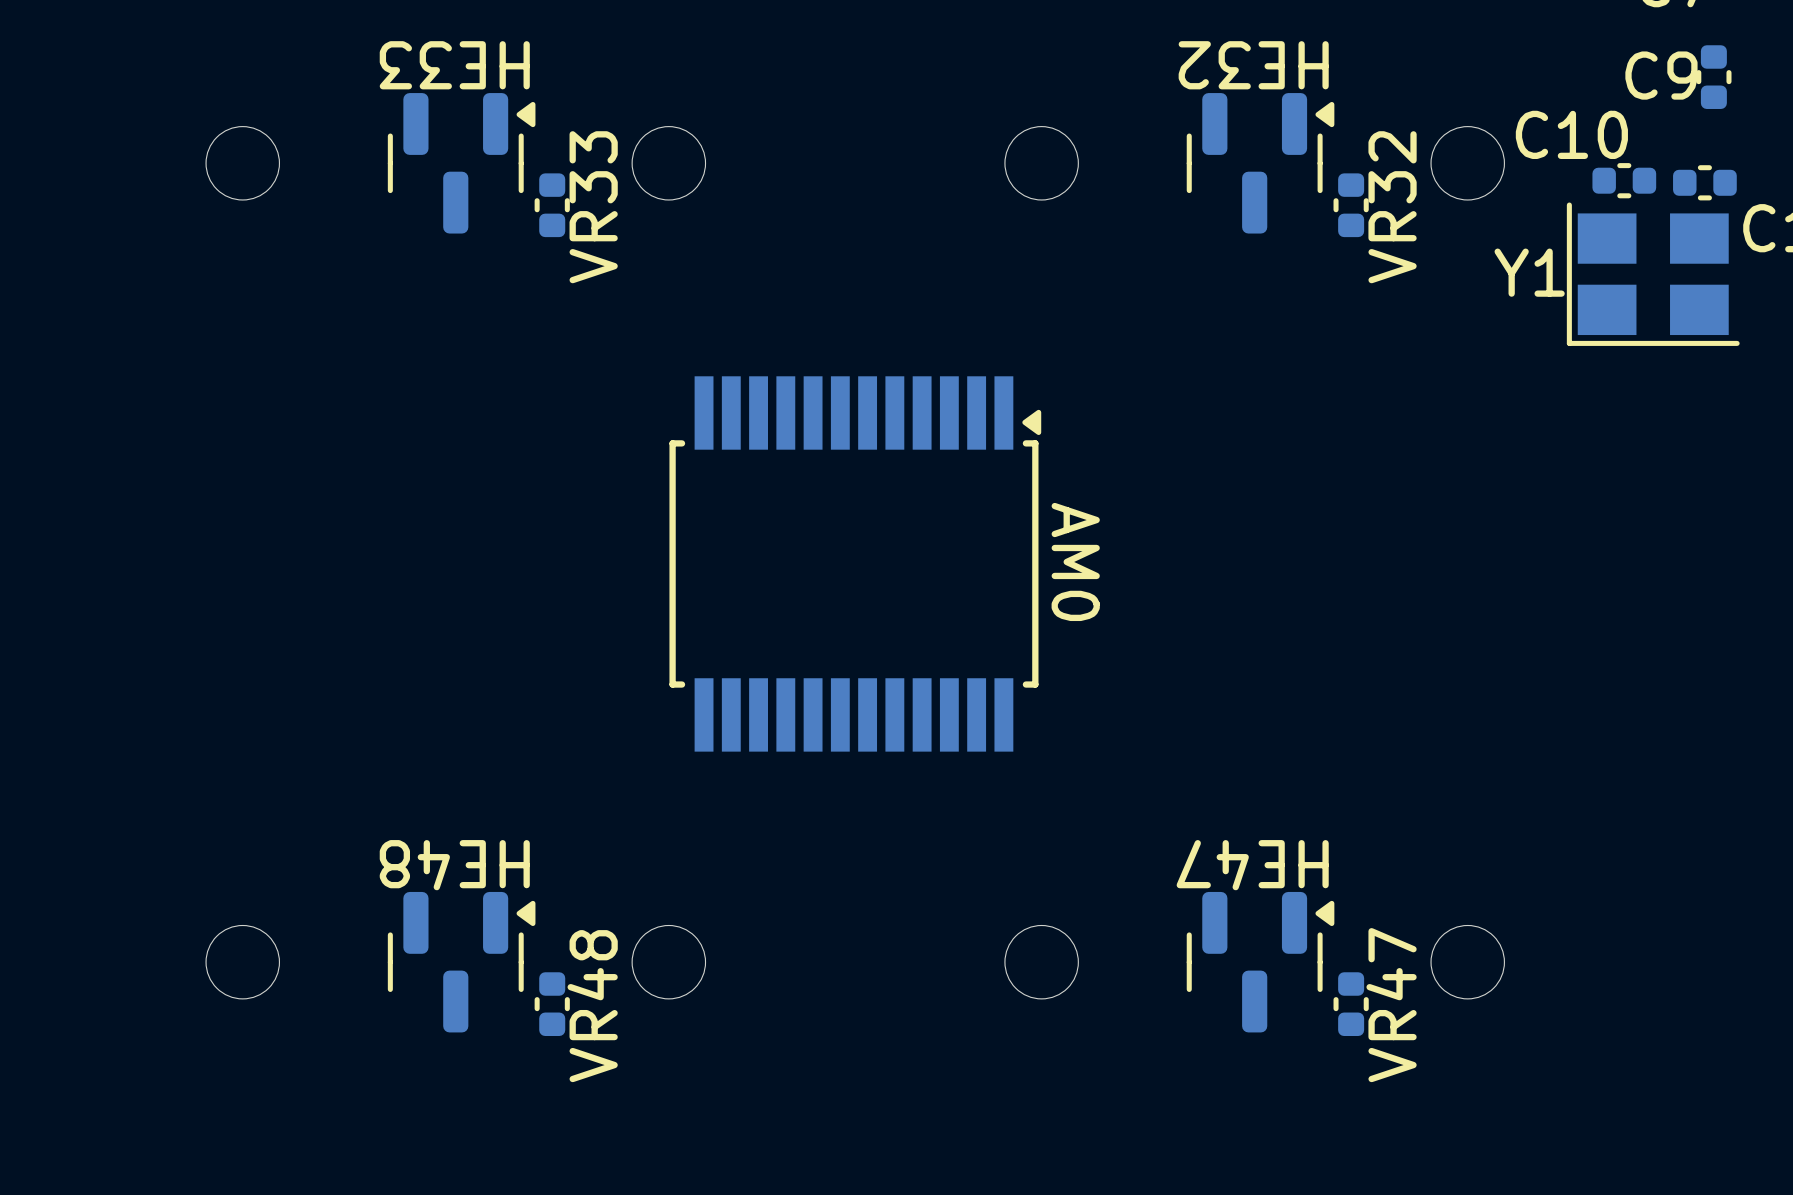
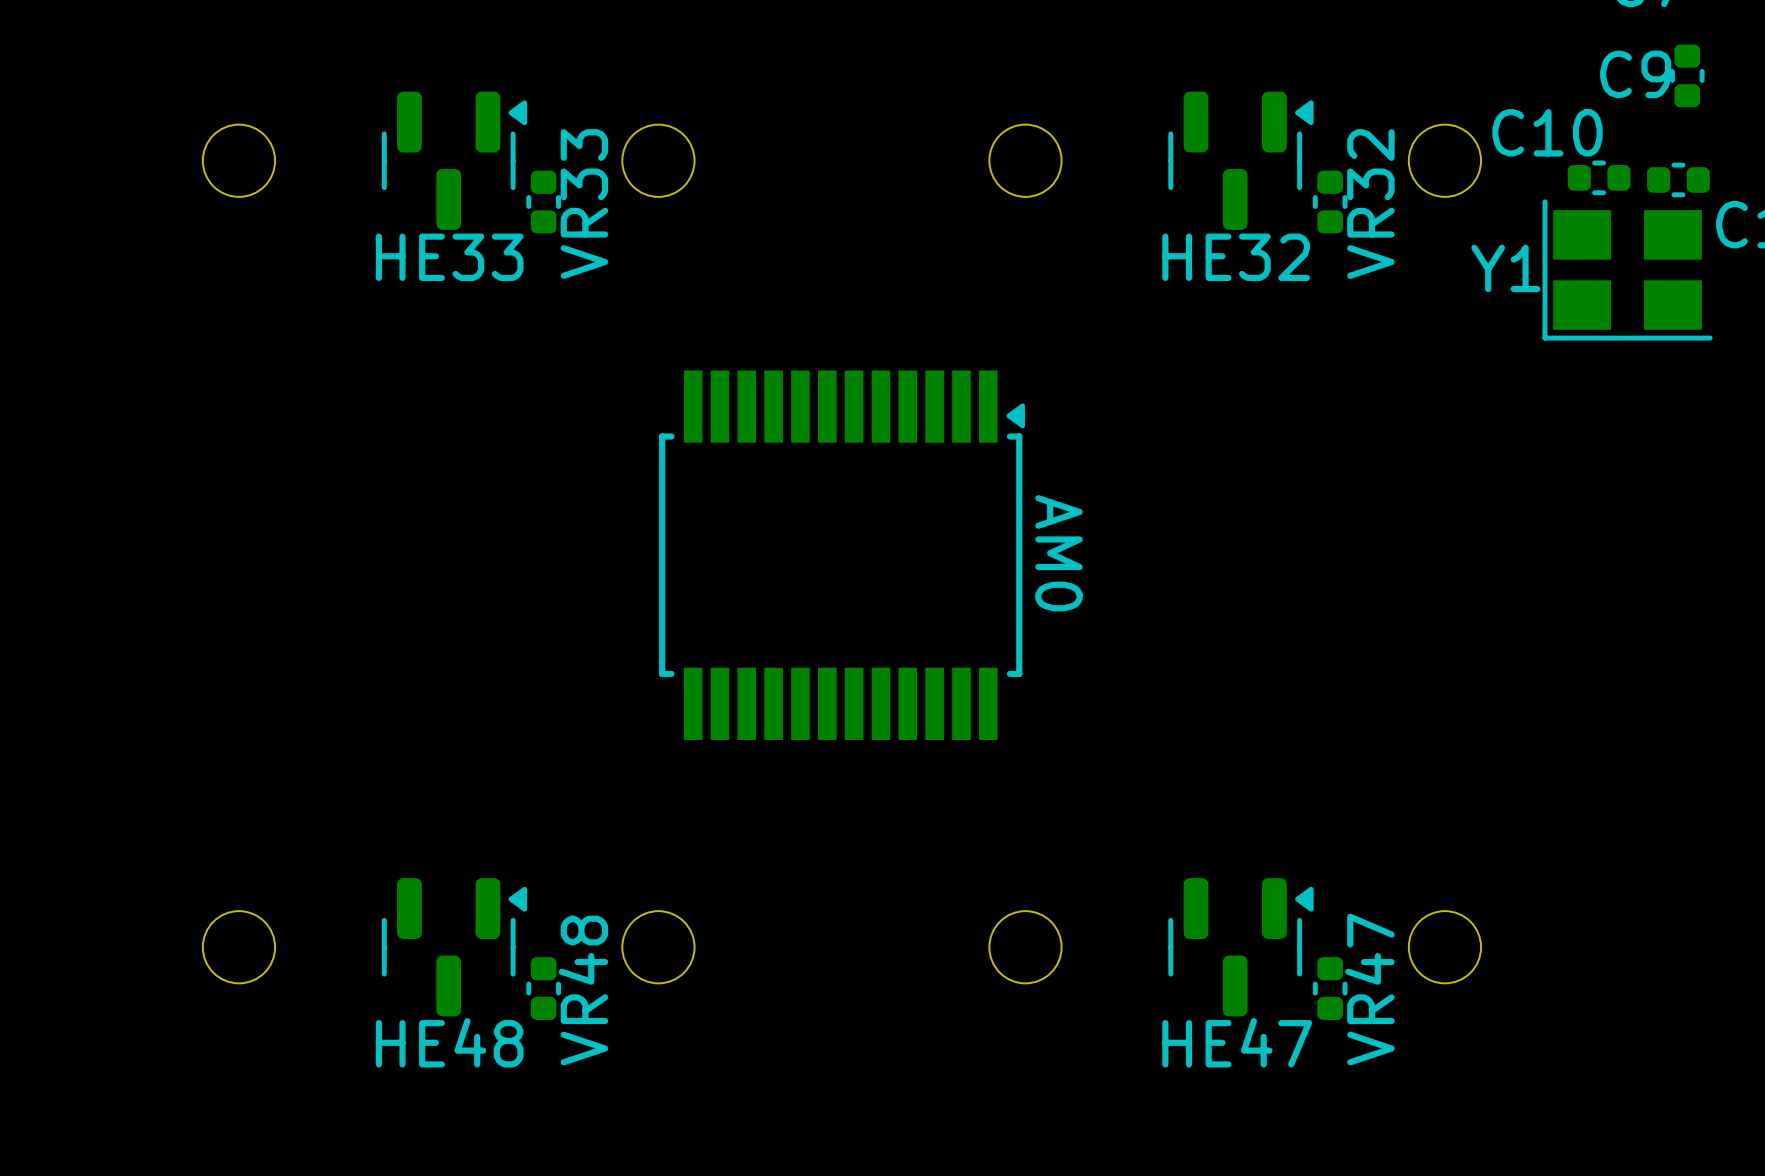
HE33 name rotation: 0° (454, 65) -> 180° (449, 257)
HE33 name position: HE33 (454, 65) -> HE33 (449, 257)
HE32 name rotation: 0° (1253, 65) -> 180° (1236, 257)
HE32 name position: HE32 (1253, 65) -> HE32 (1236, 257)
HE48 name rotation: 0° (454, 865) -> 180° (449, 1042)
HE48 name position: HE48 (454, 865) -> HE48 (449, 1042)
HE47 name rotation: 0° (1252, 865) -> 180° (1237, 1042)
HE47 name position: HE47 (1252, 865) -> HE47 (1237, 1042)

